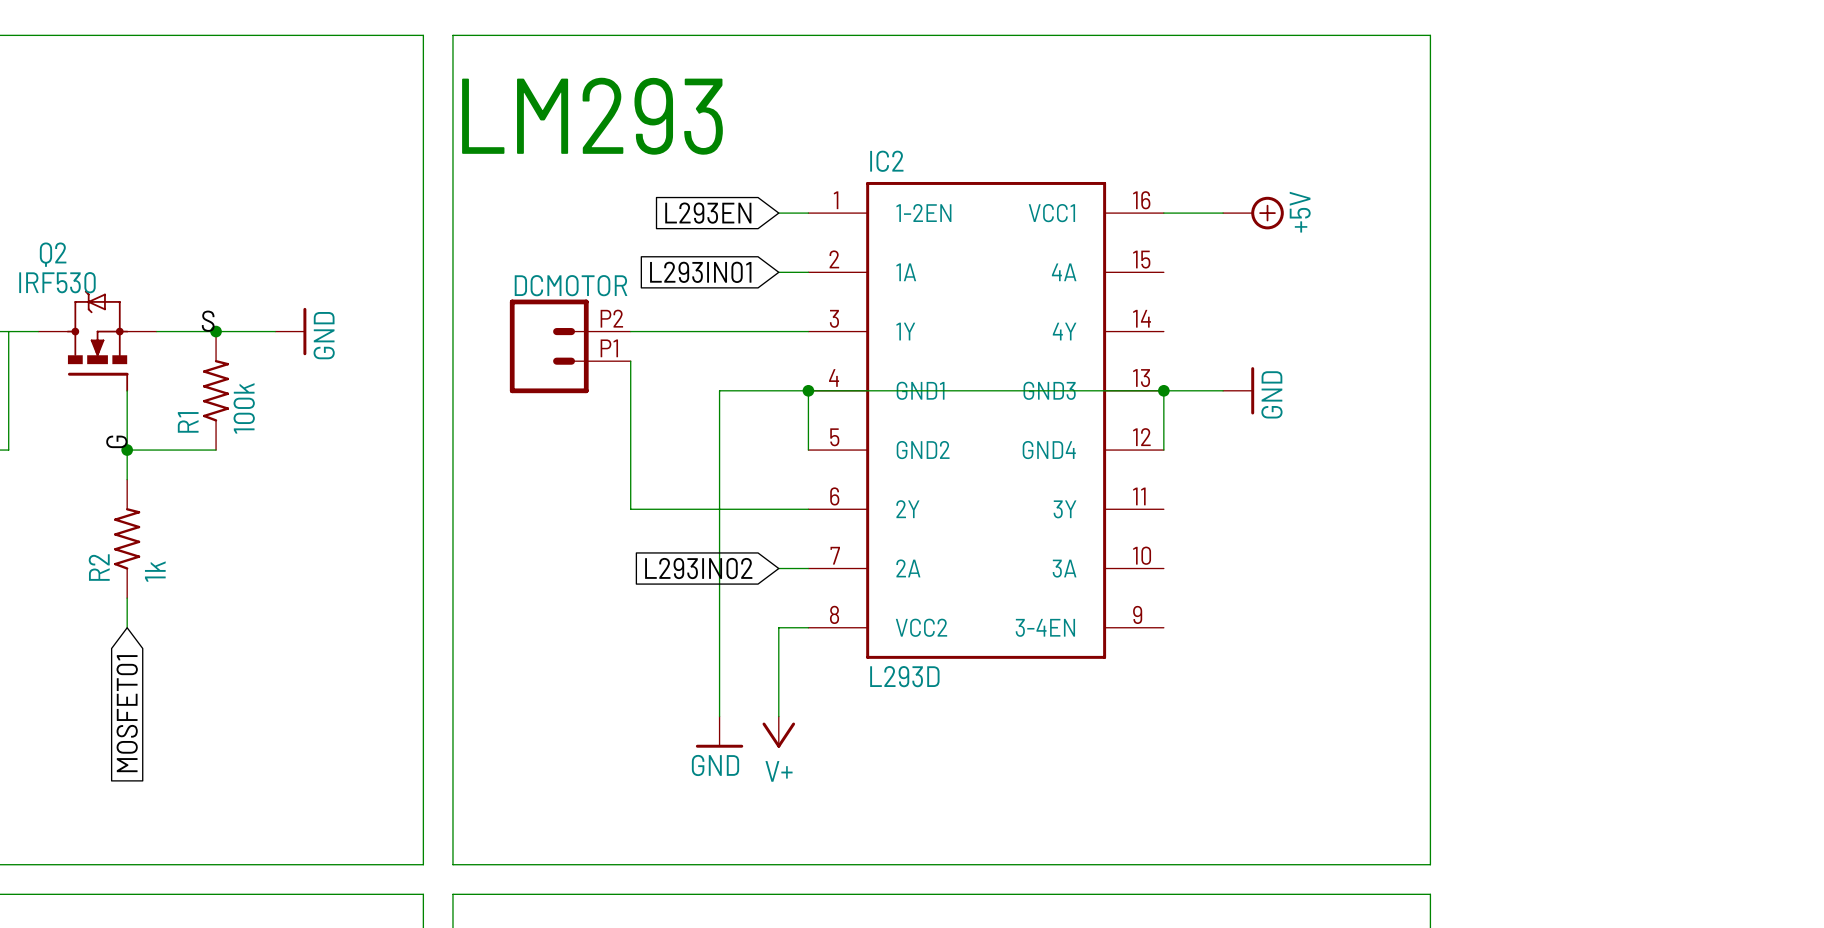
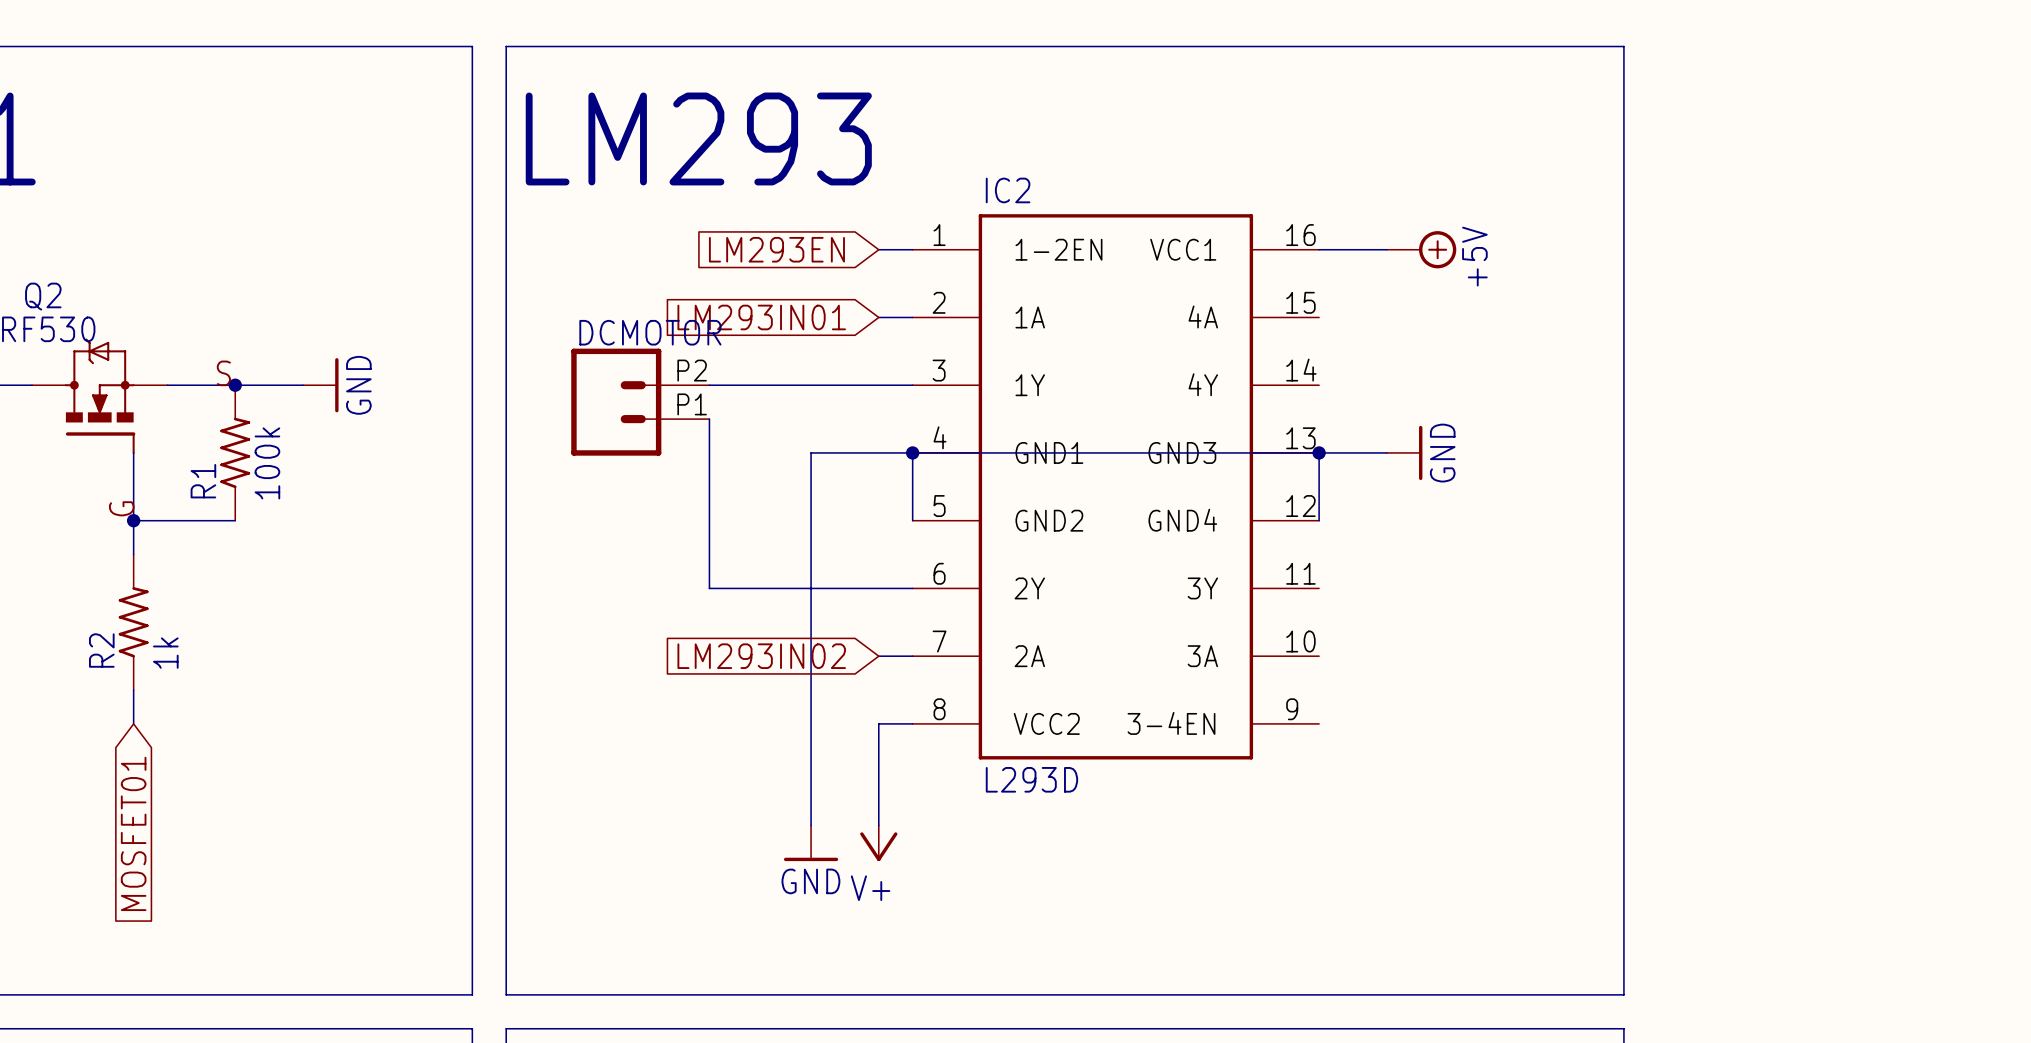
global label: L293EN (708, 213) -> LM293EN (776, 249)
global label: L293IN01 (700, 272) -> LM293IN01 (761, 317)
global label: L293IN02 (698, 568) -> LM293IN02 (761, 656)

